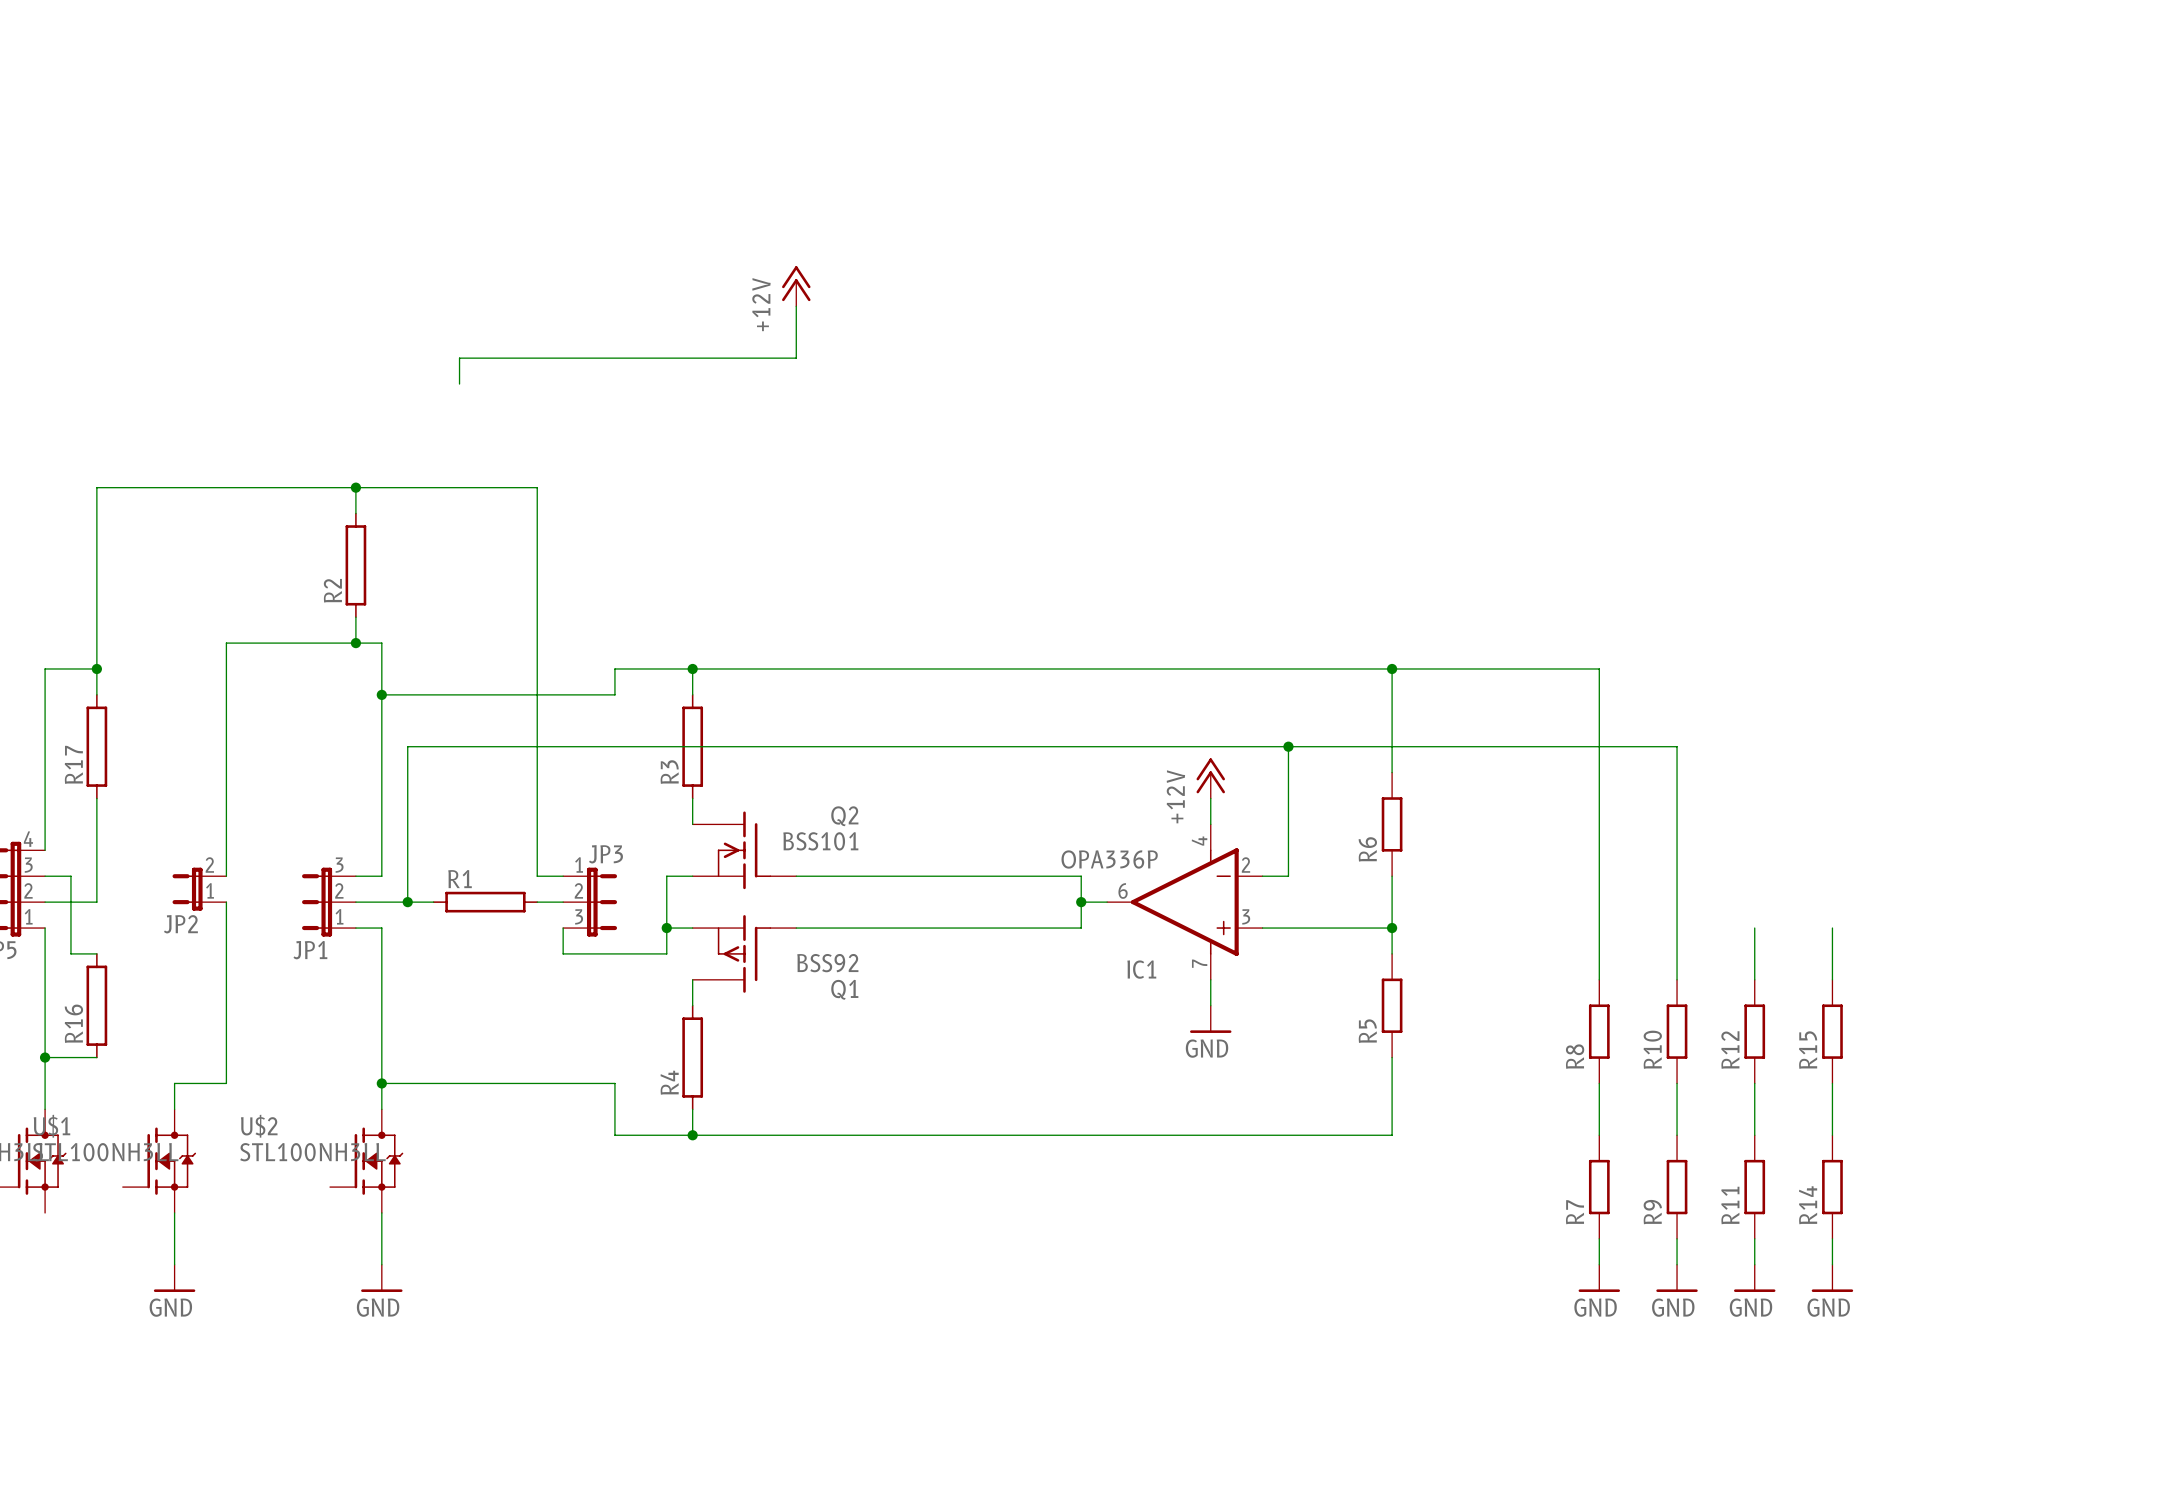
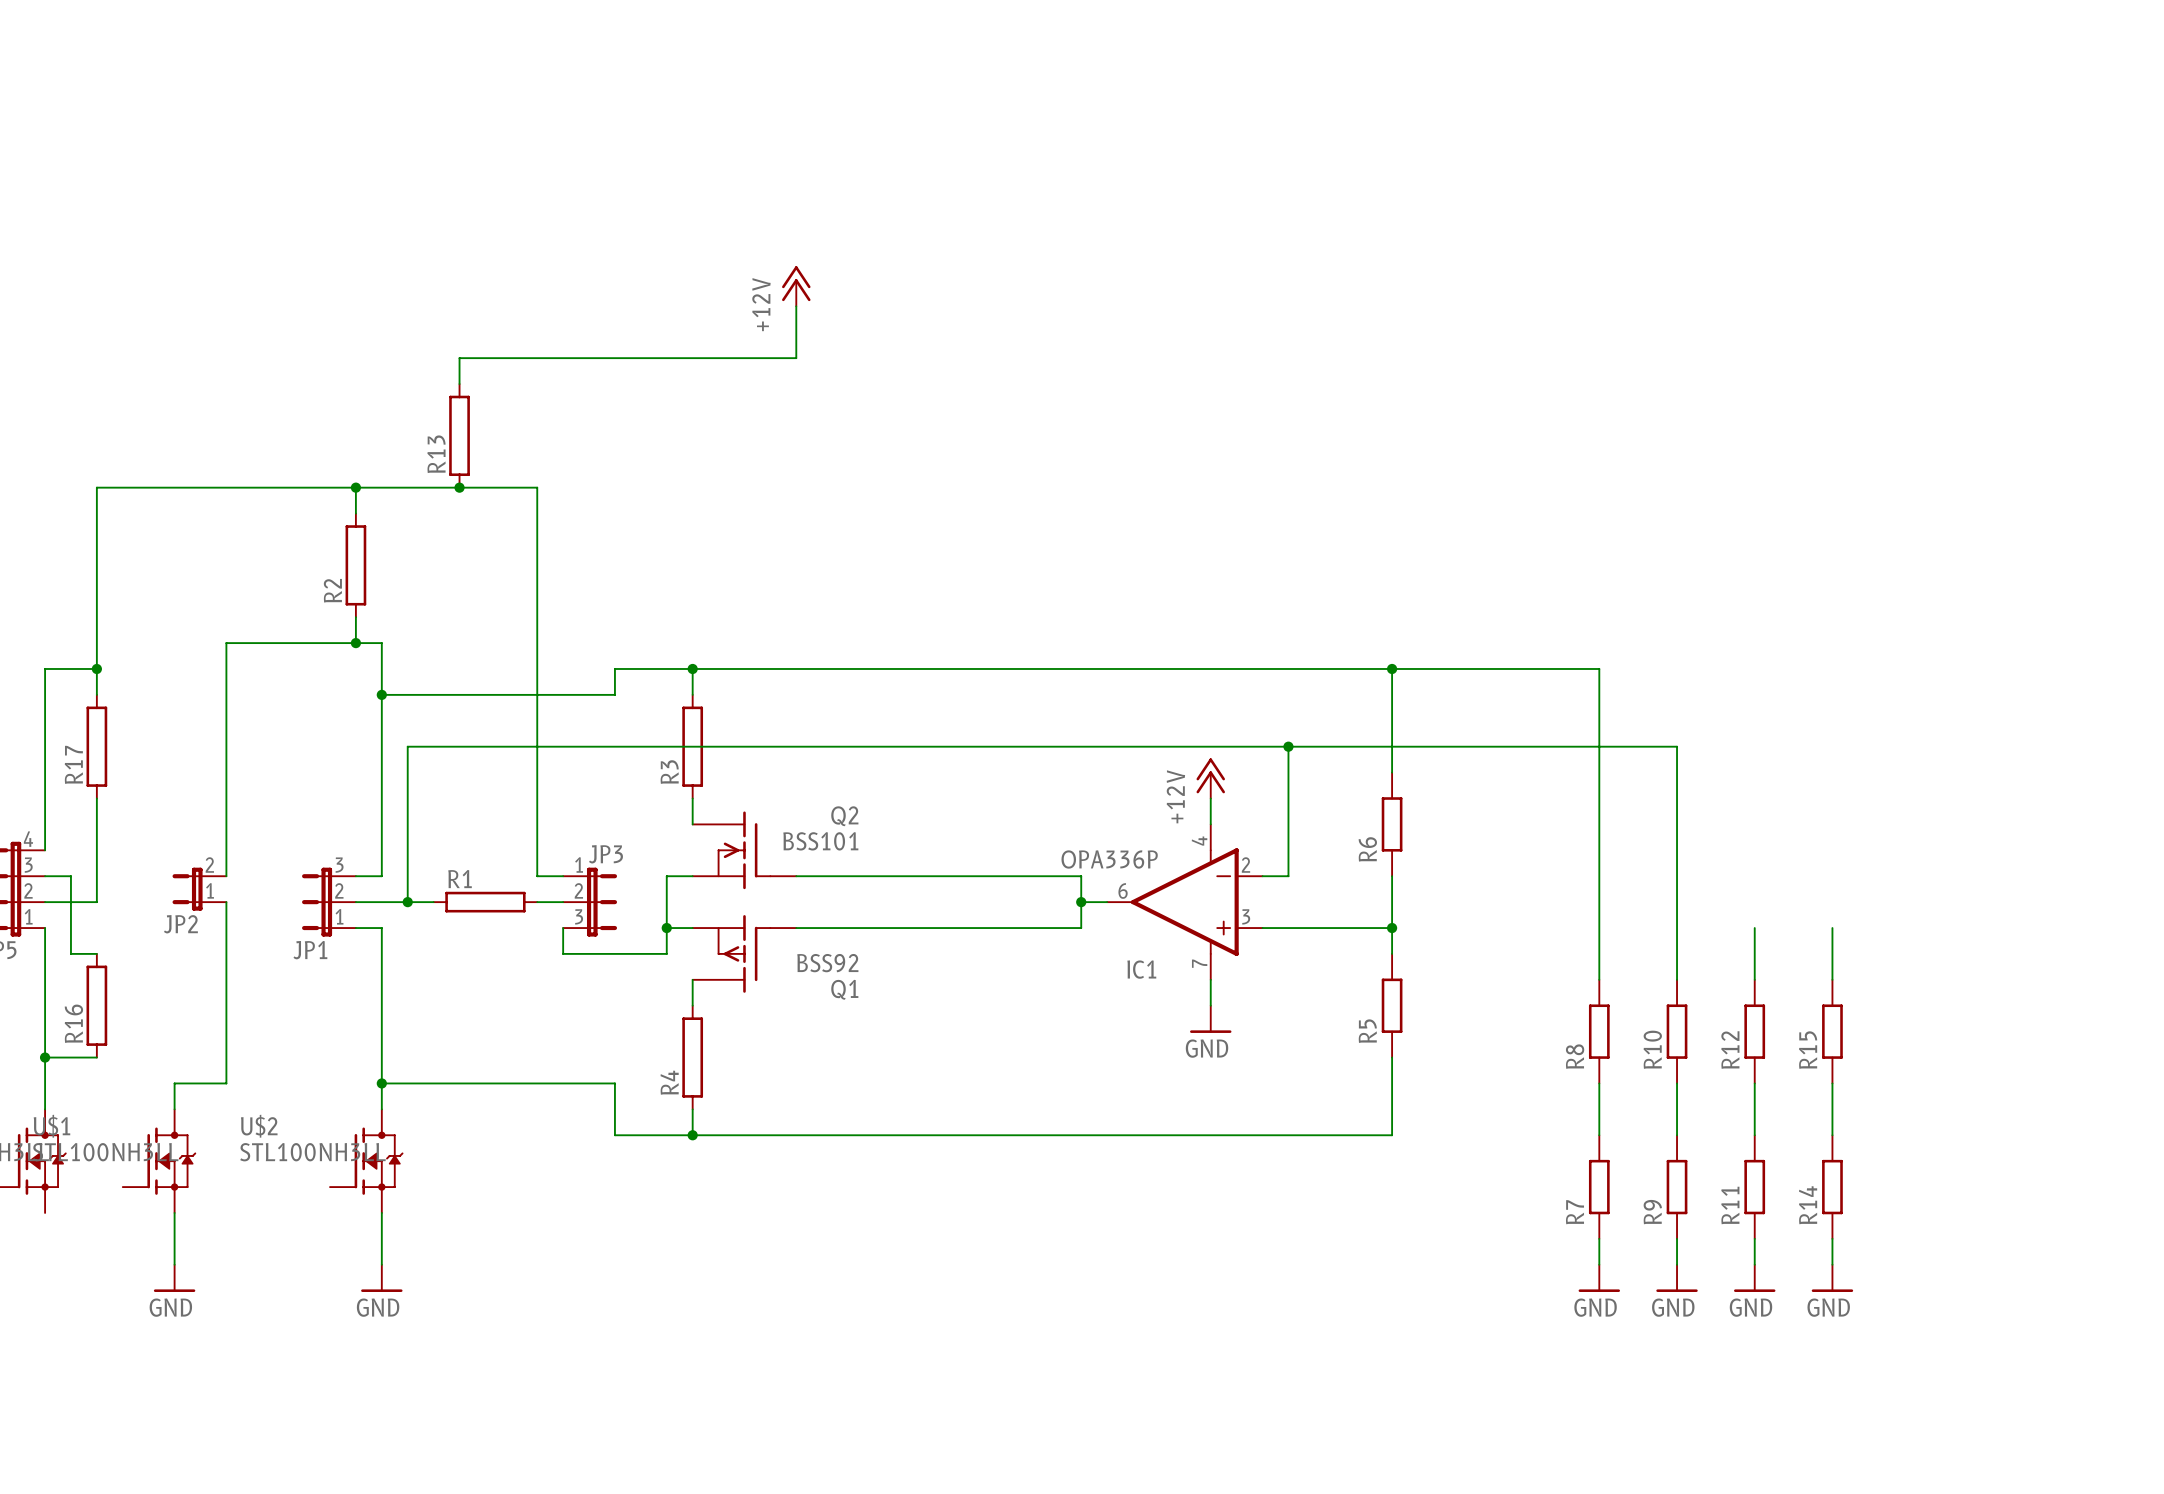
R13: none -> (459, 435)
junction: none -> (459, 487)

